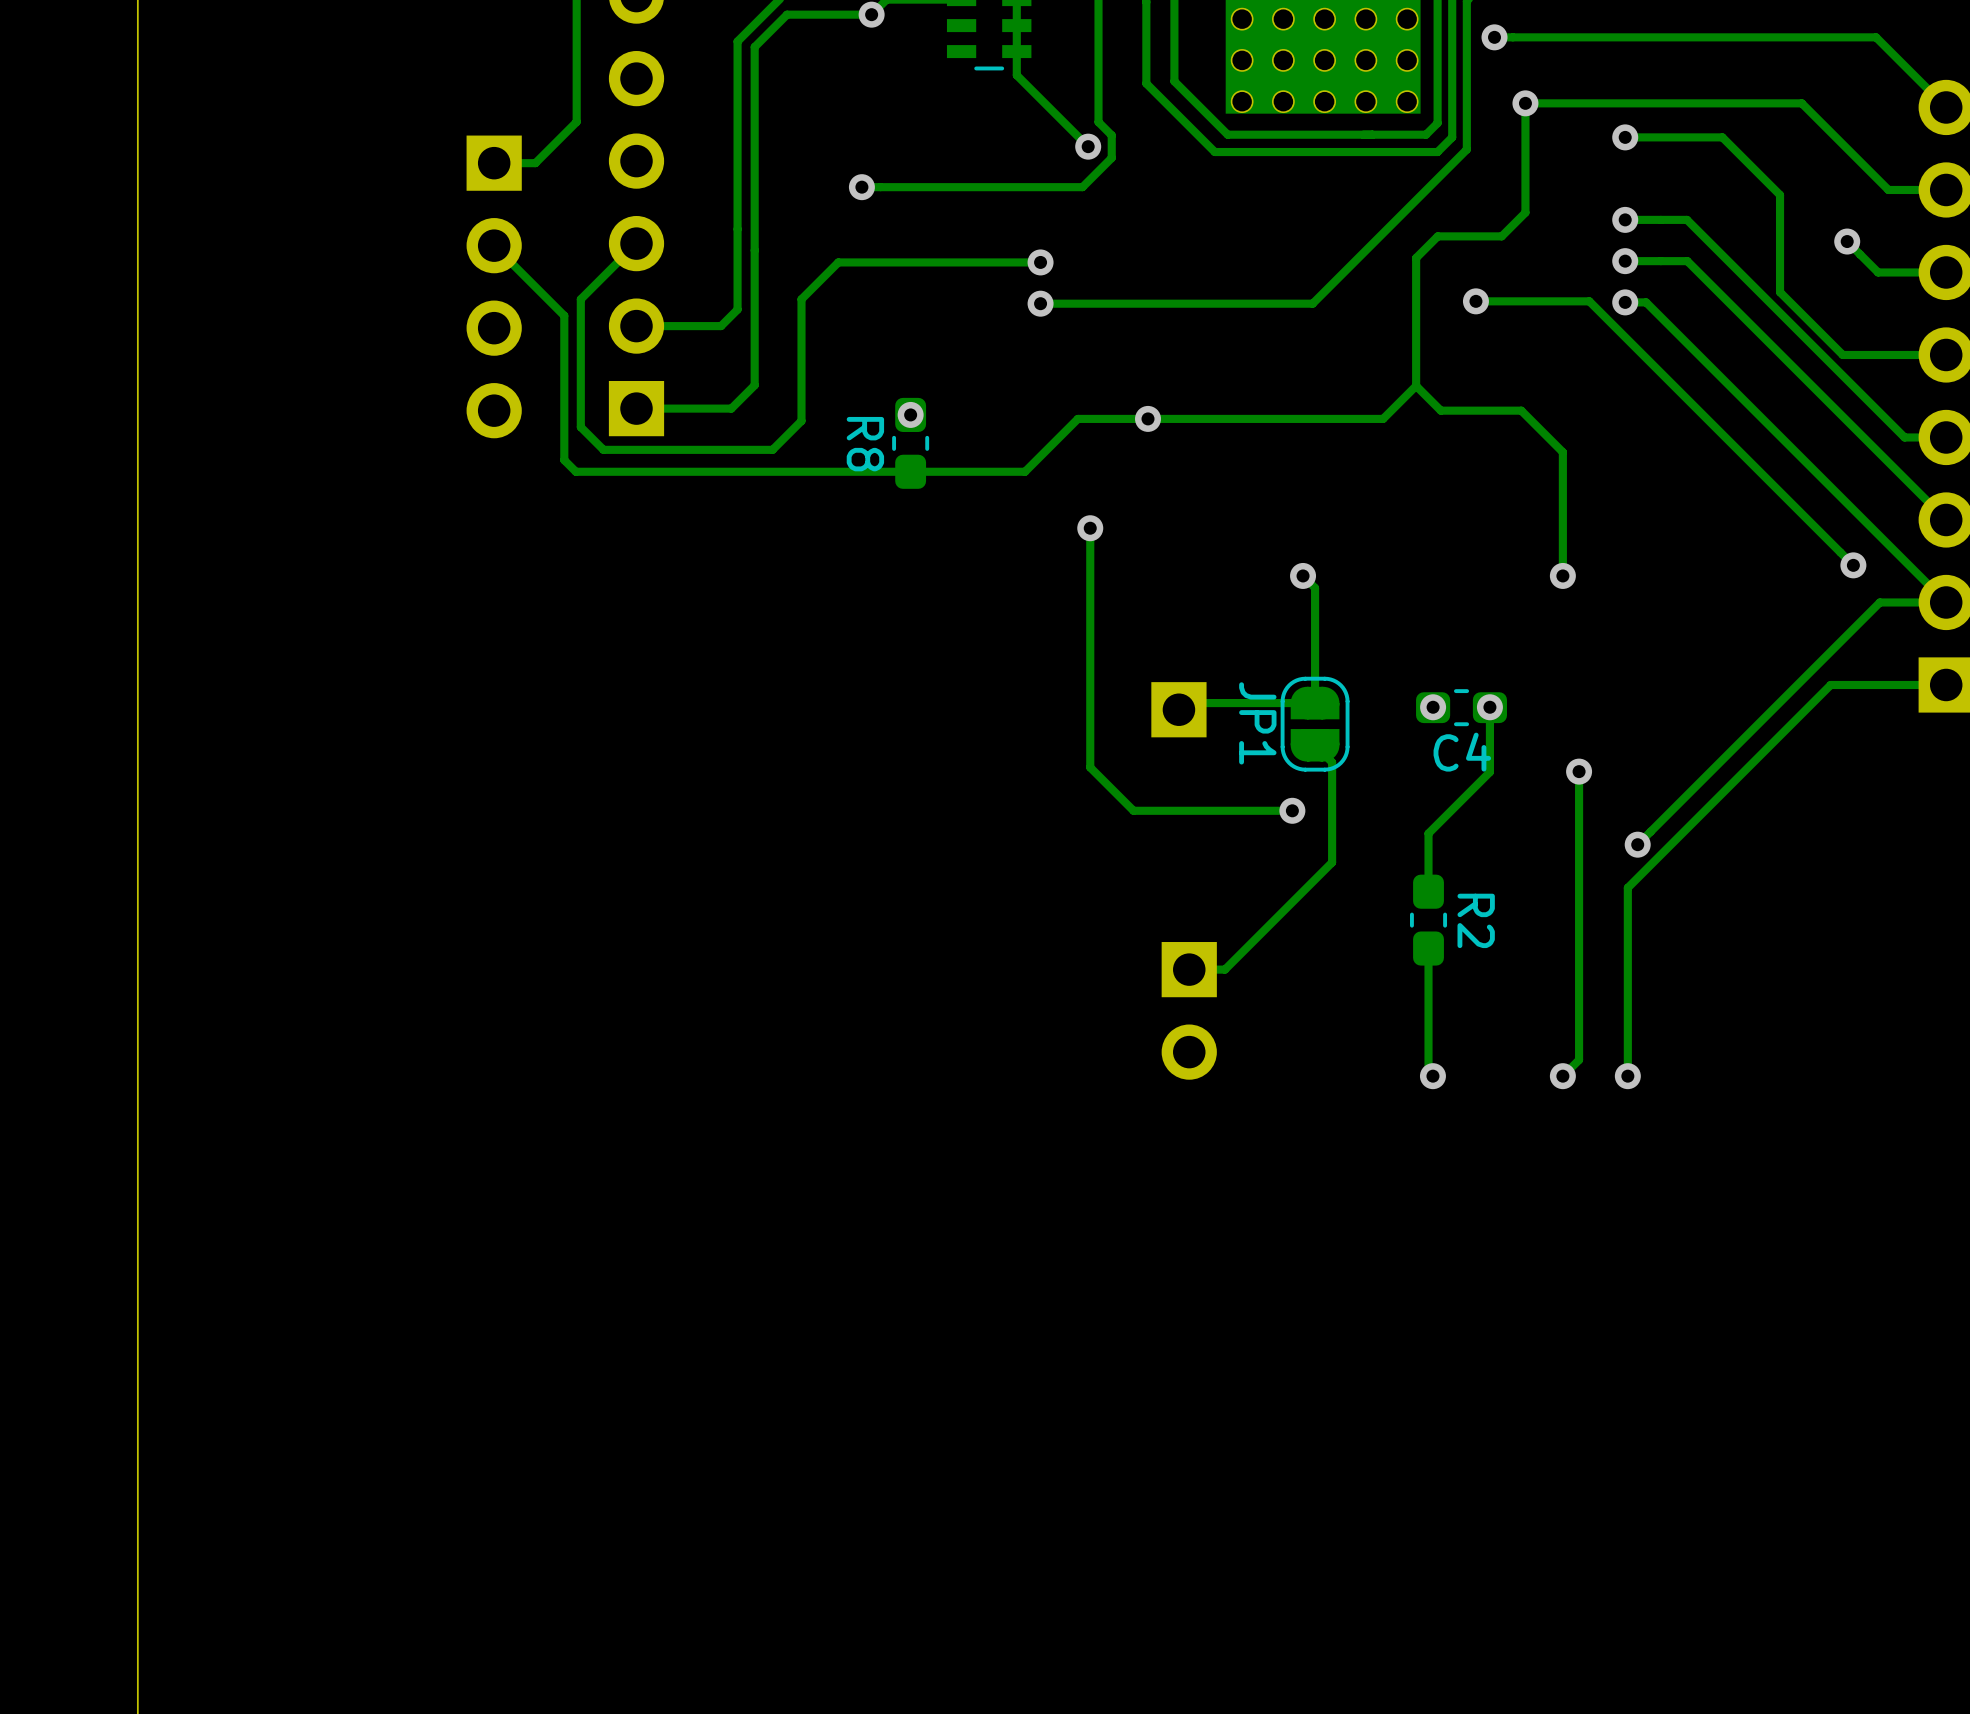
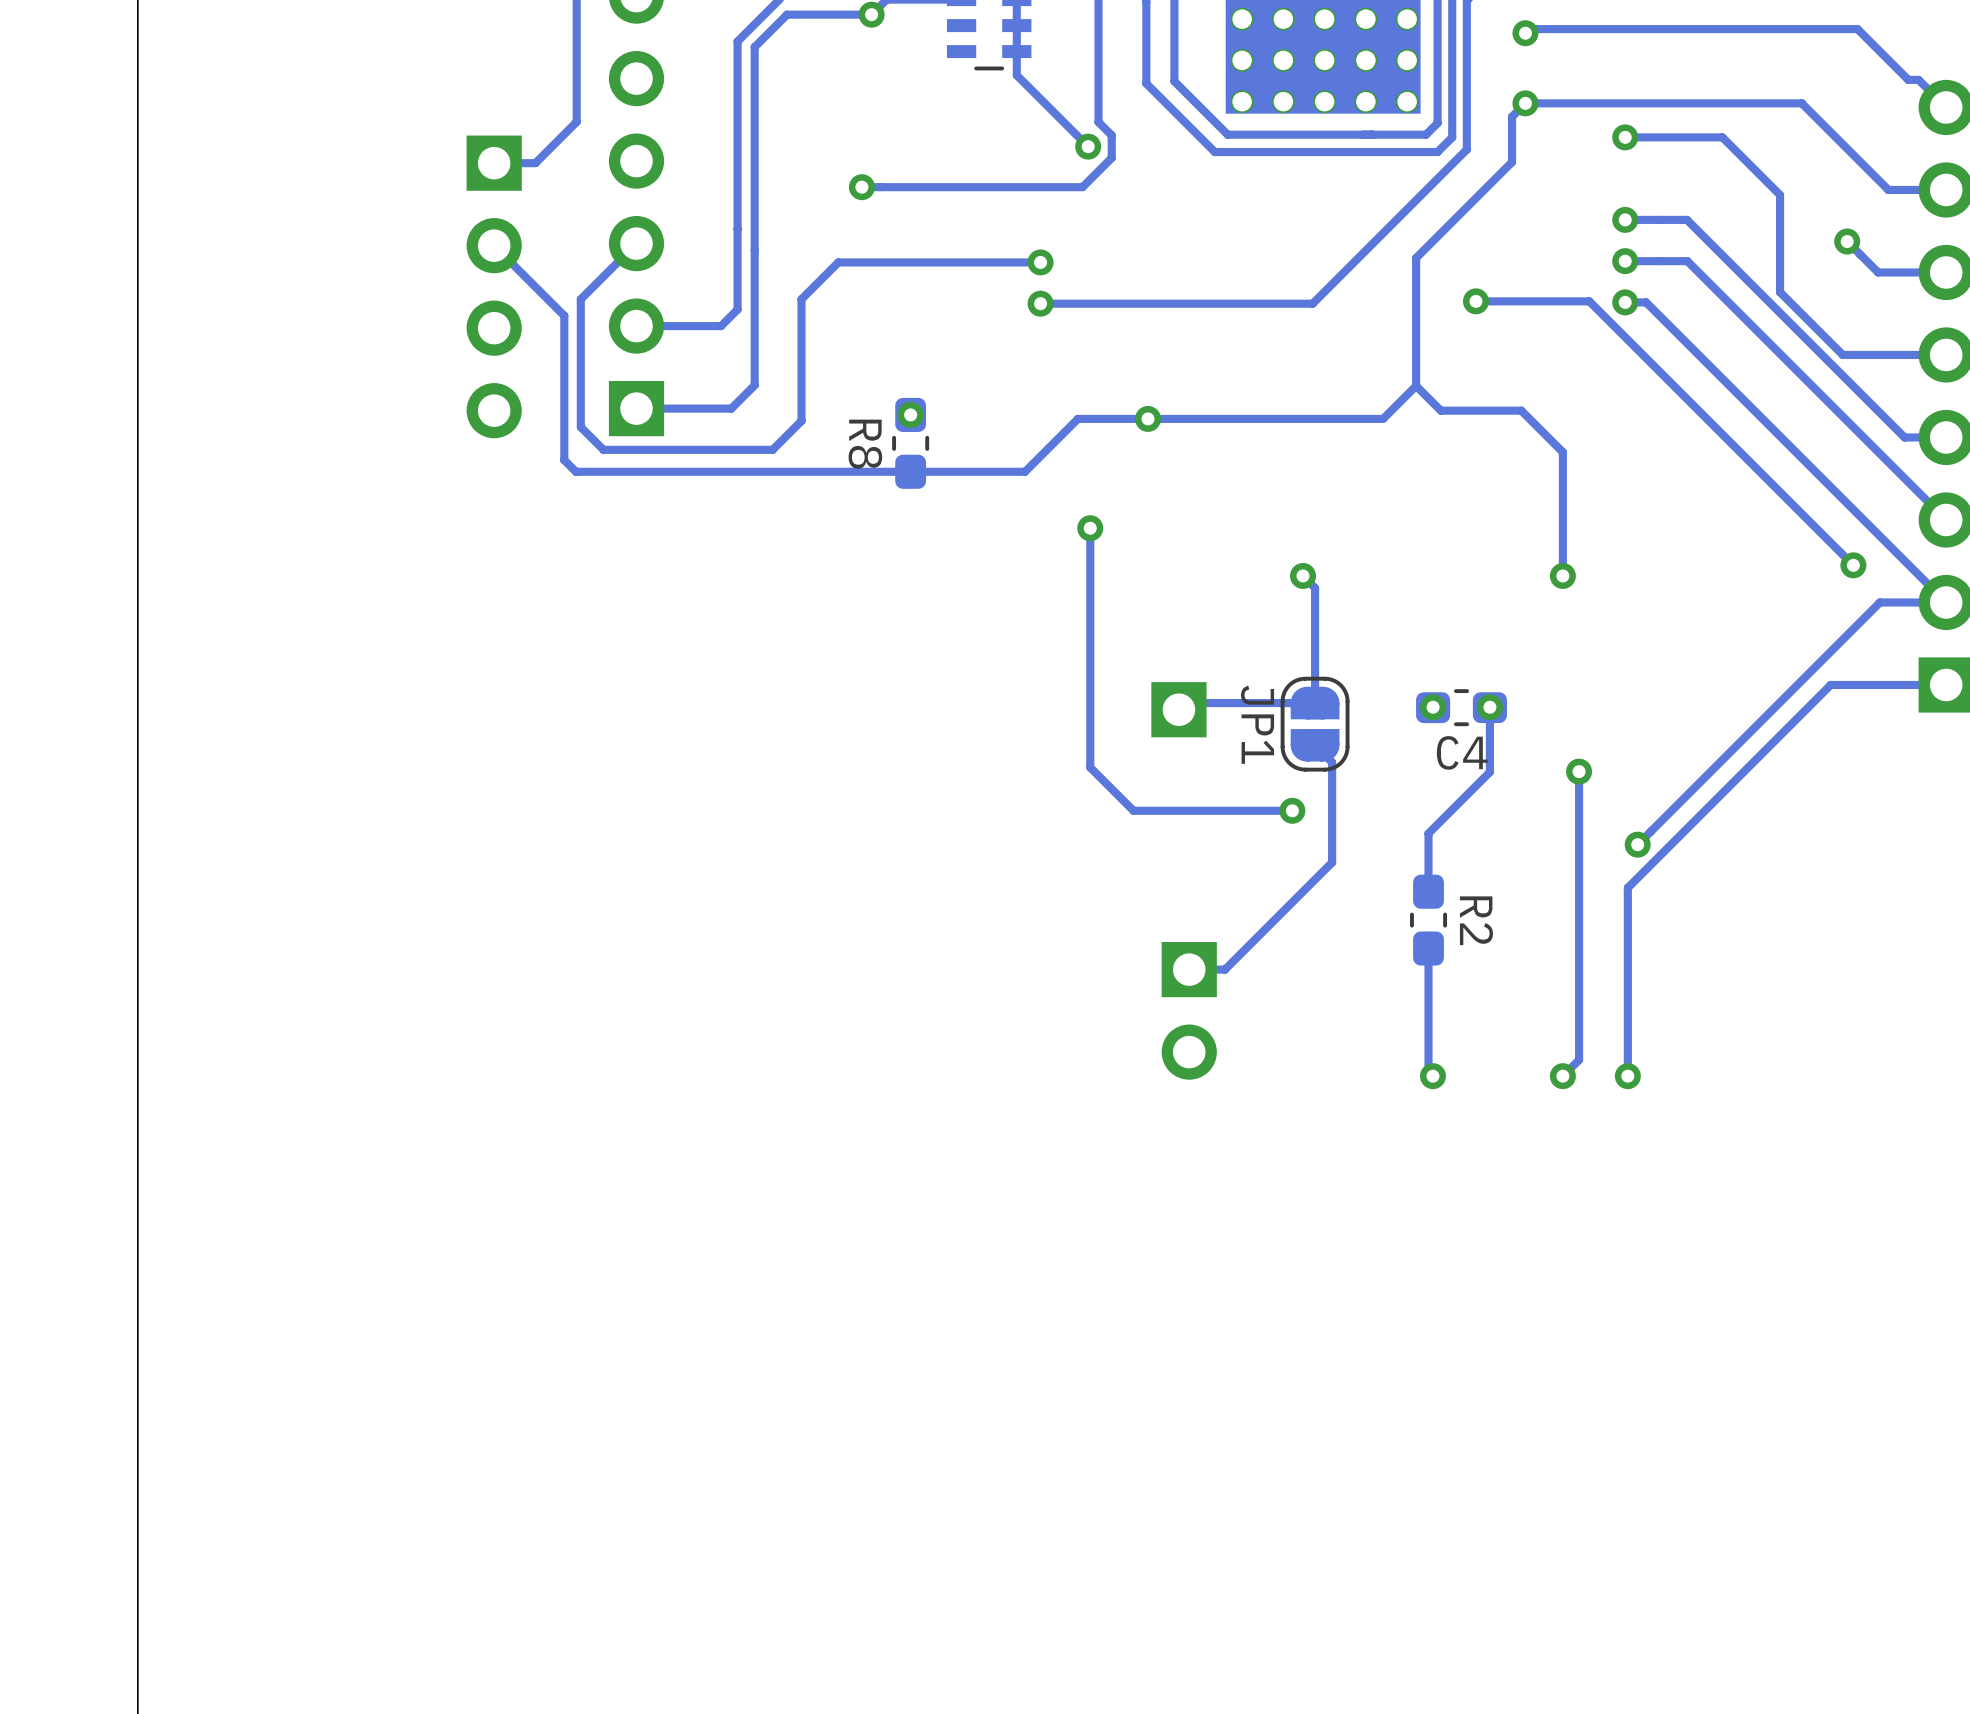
track: (1494, 37) (1876, 37) (1918, 79) -> (1525, 33) (1529, 29) (1857, 29) (1908, 79) (1918, 79)
via position: (1494, 37) -> (1525, 33)
track: (1525, 103) (1525, 212) (1501, 236) (1437, 236) -> (1525, 103) (1512, 116) (1512, 162) (1437, 236)

